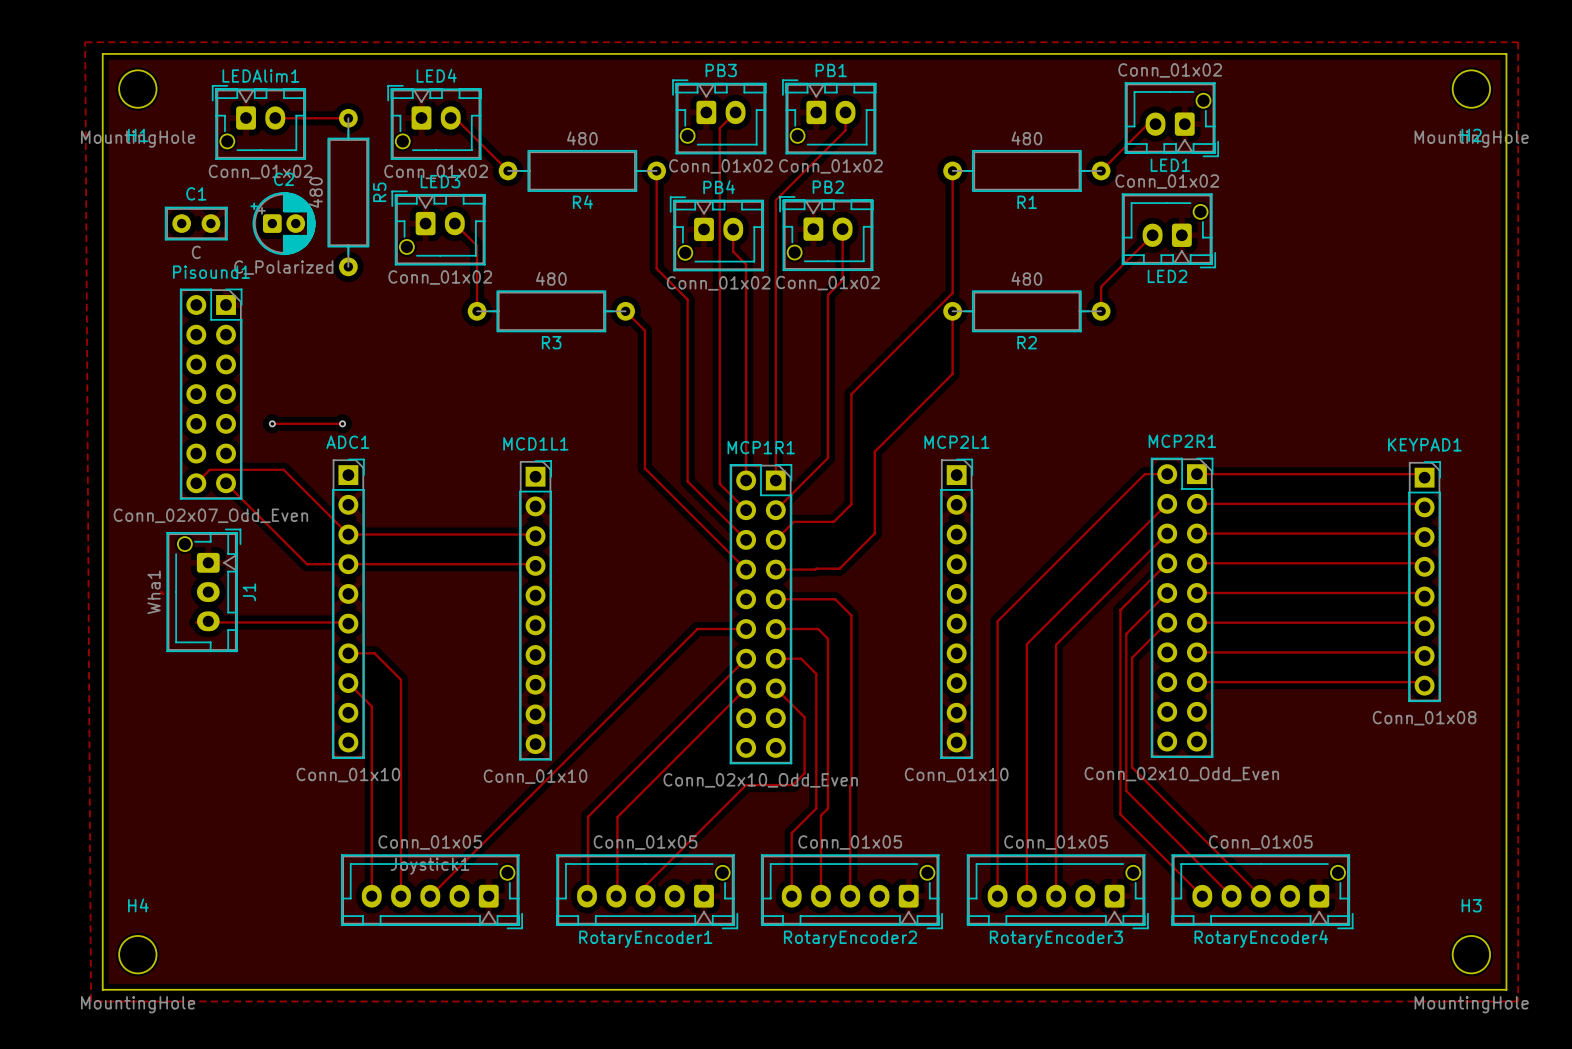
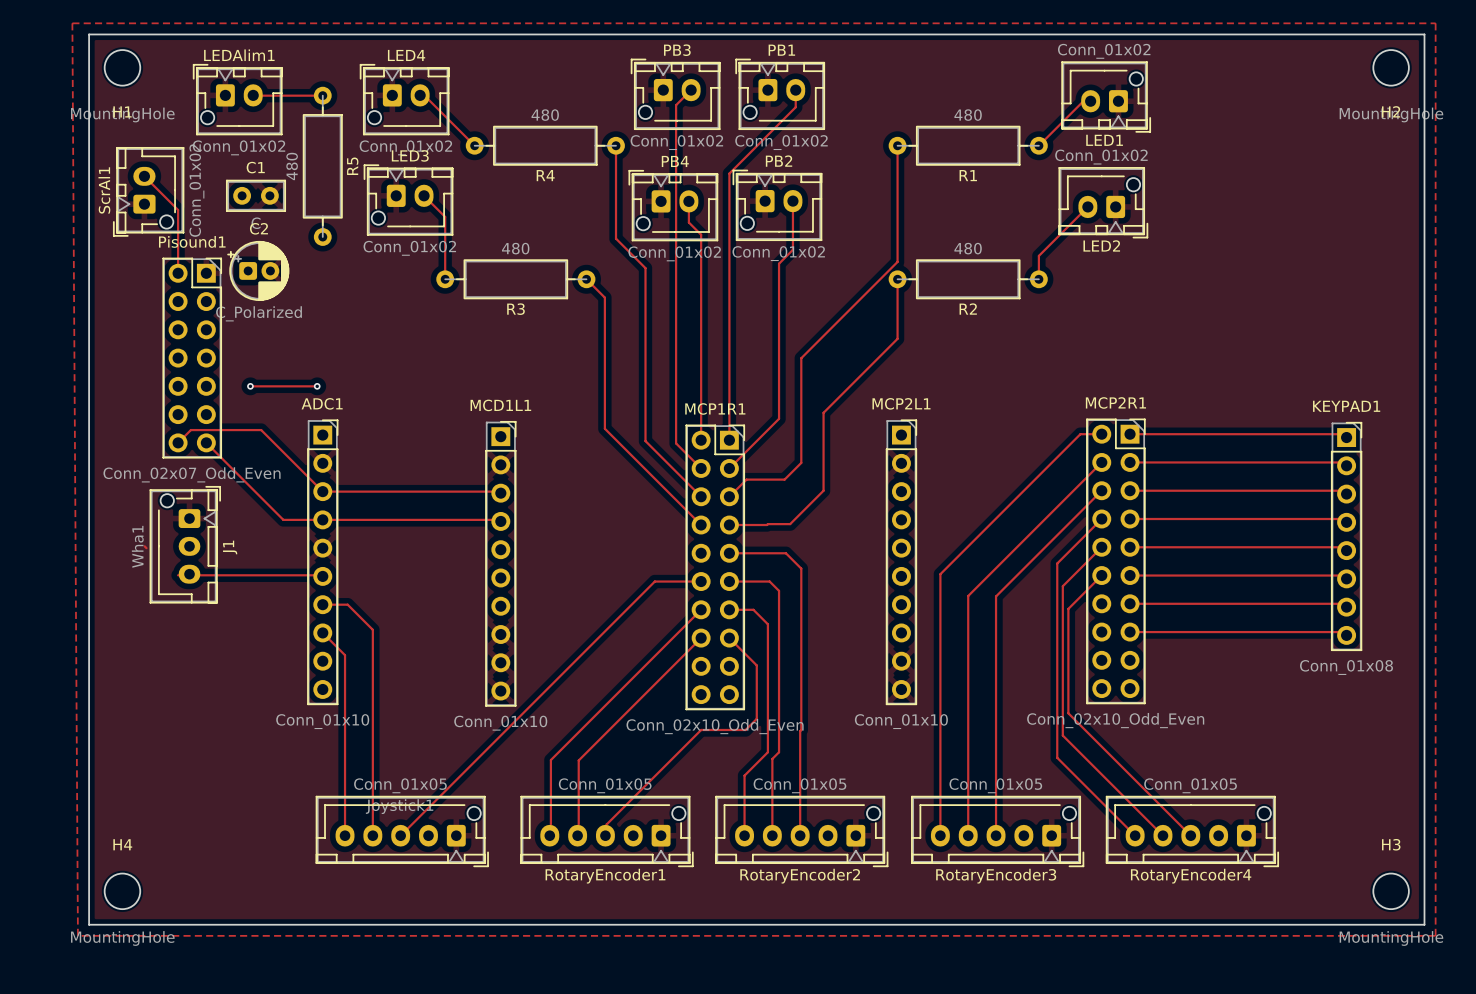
track: none -> (144, 176) (178, 210) (178, 273)
ScrAl1: none -> Conn_01x02 (148, 191)
C1 position: (196, 223) -> (256, 195)
C2 position: (282, 223) -> (258, 270)

